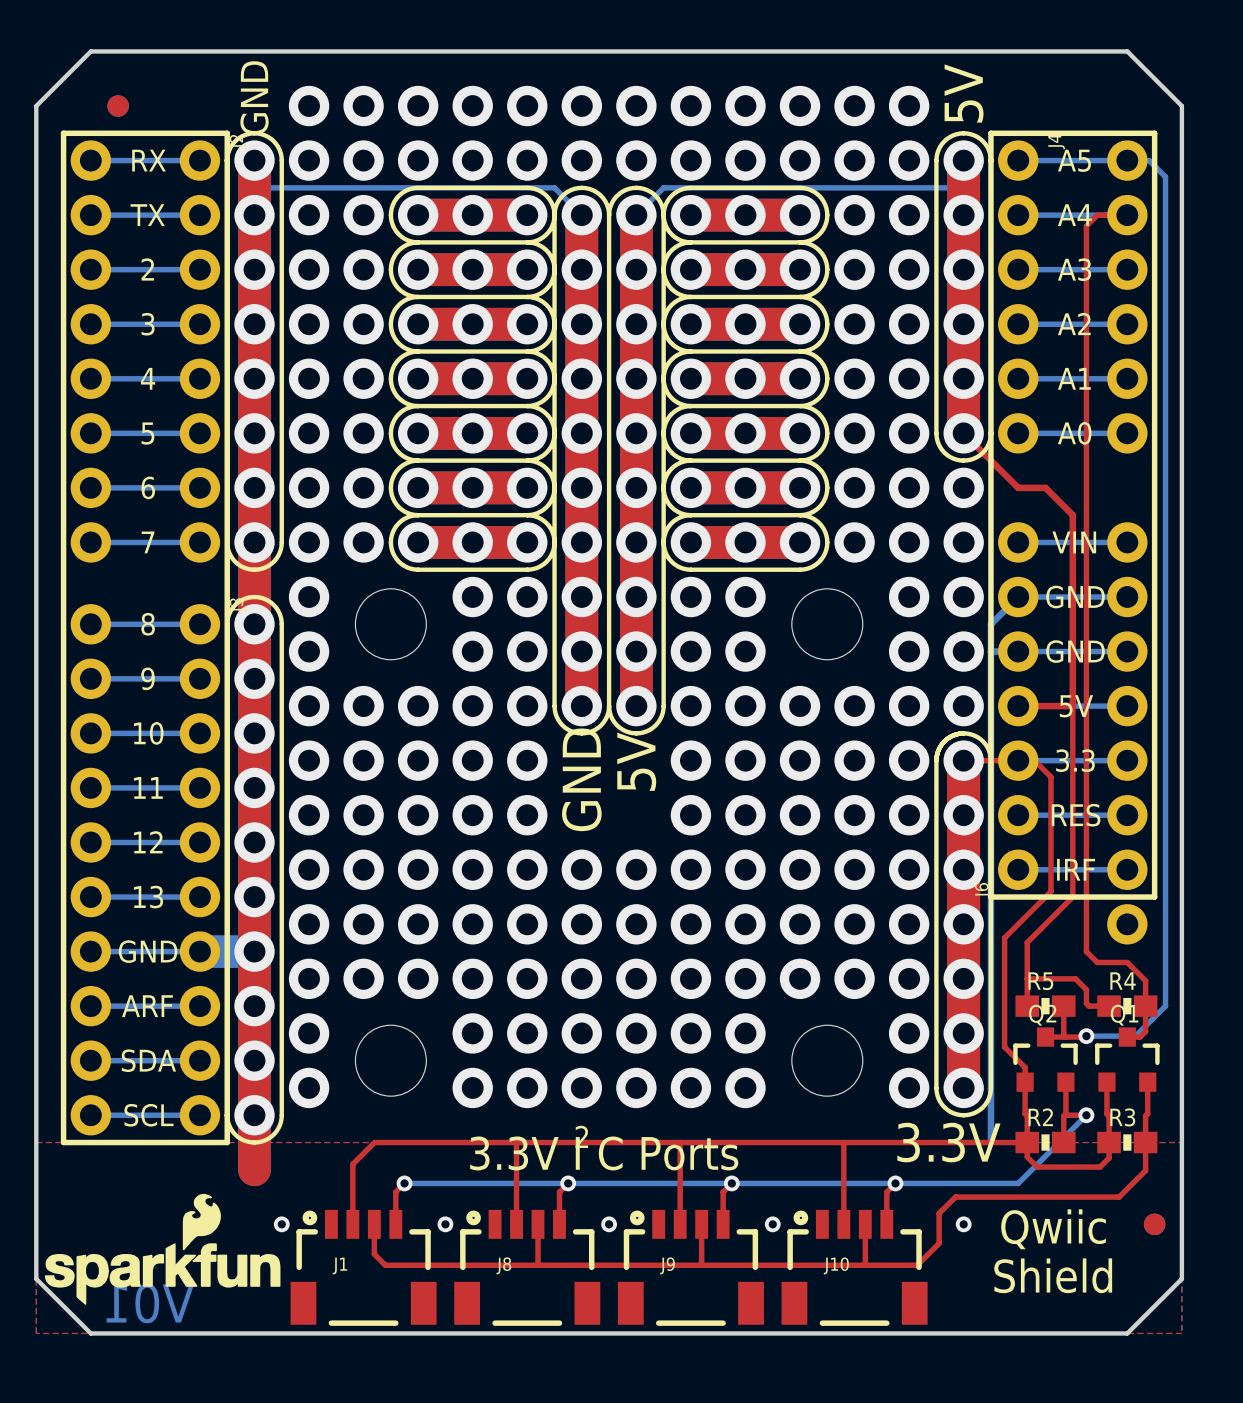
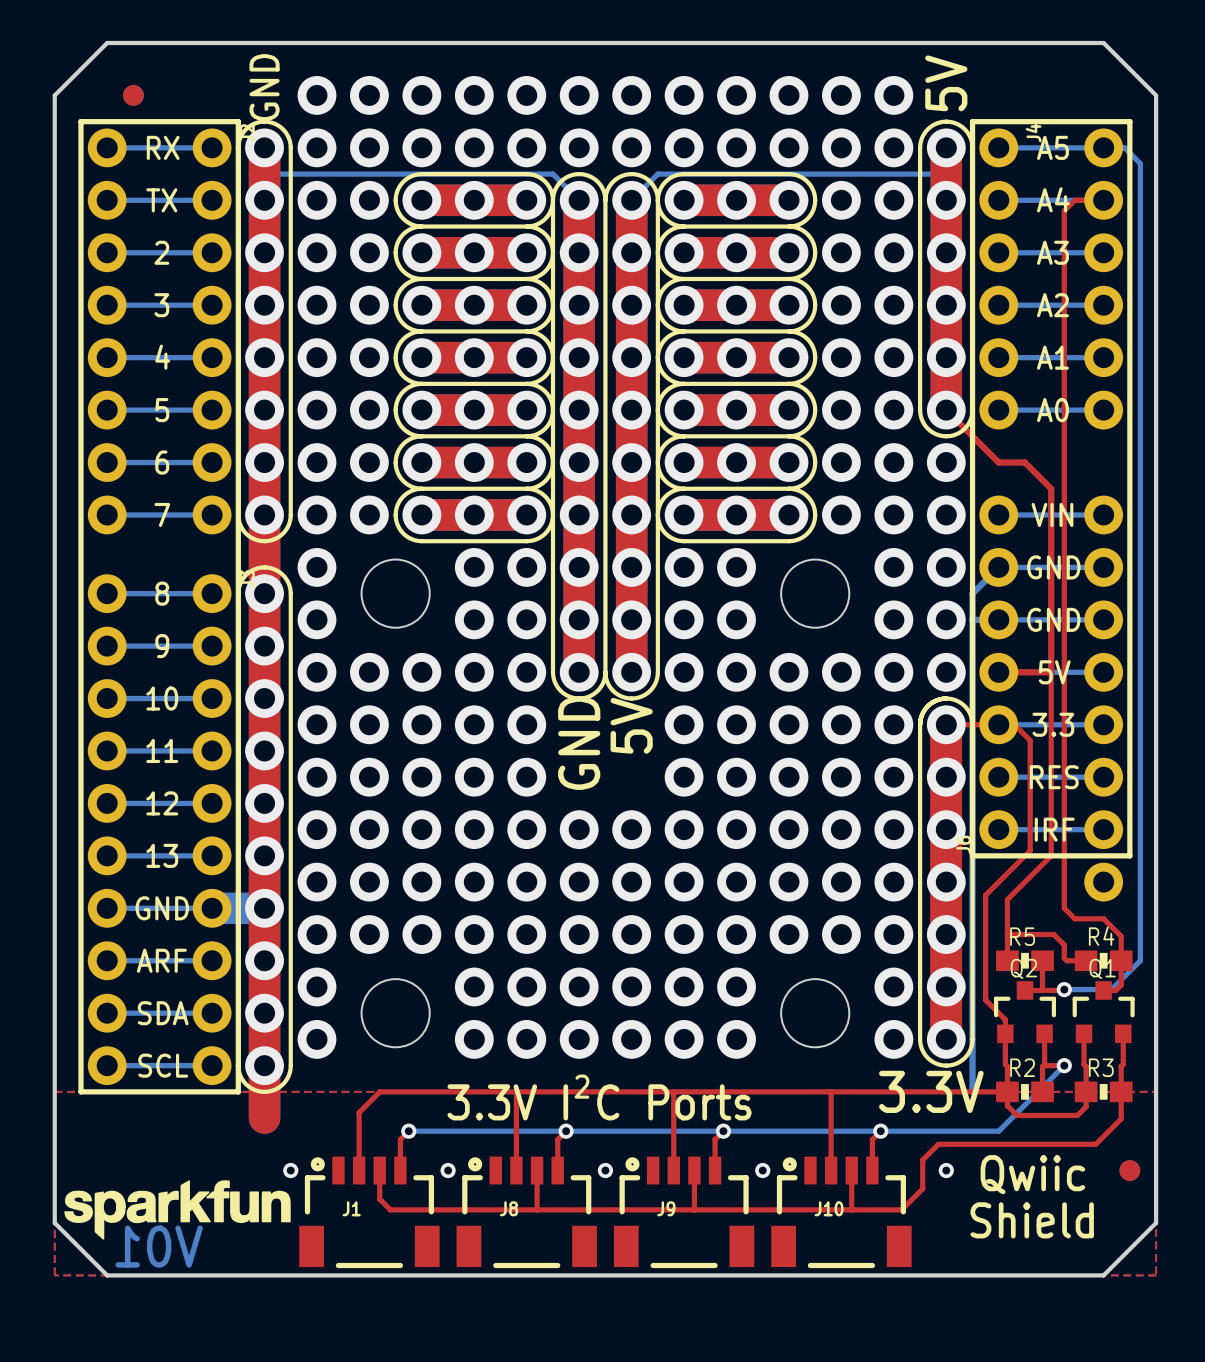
drawing shape: [44, 1193, 281, 1305] -> [64, 1180, 291, 1240]

